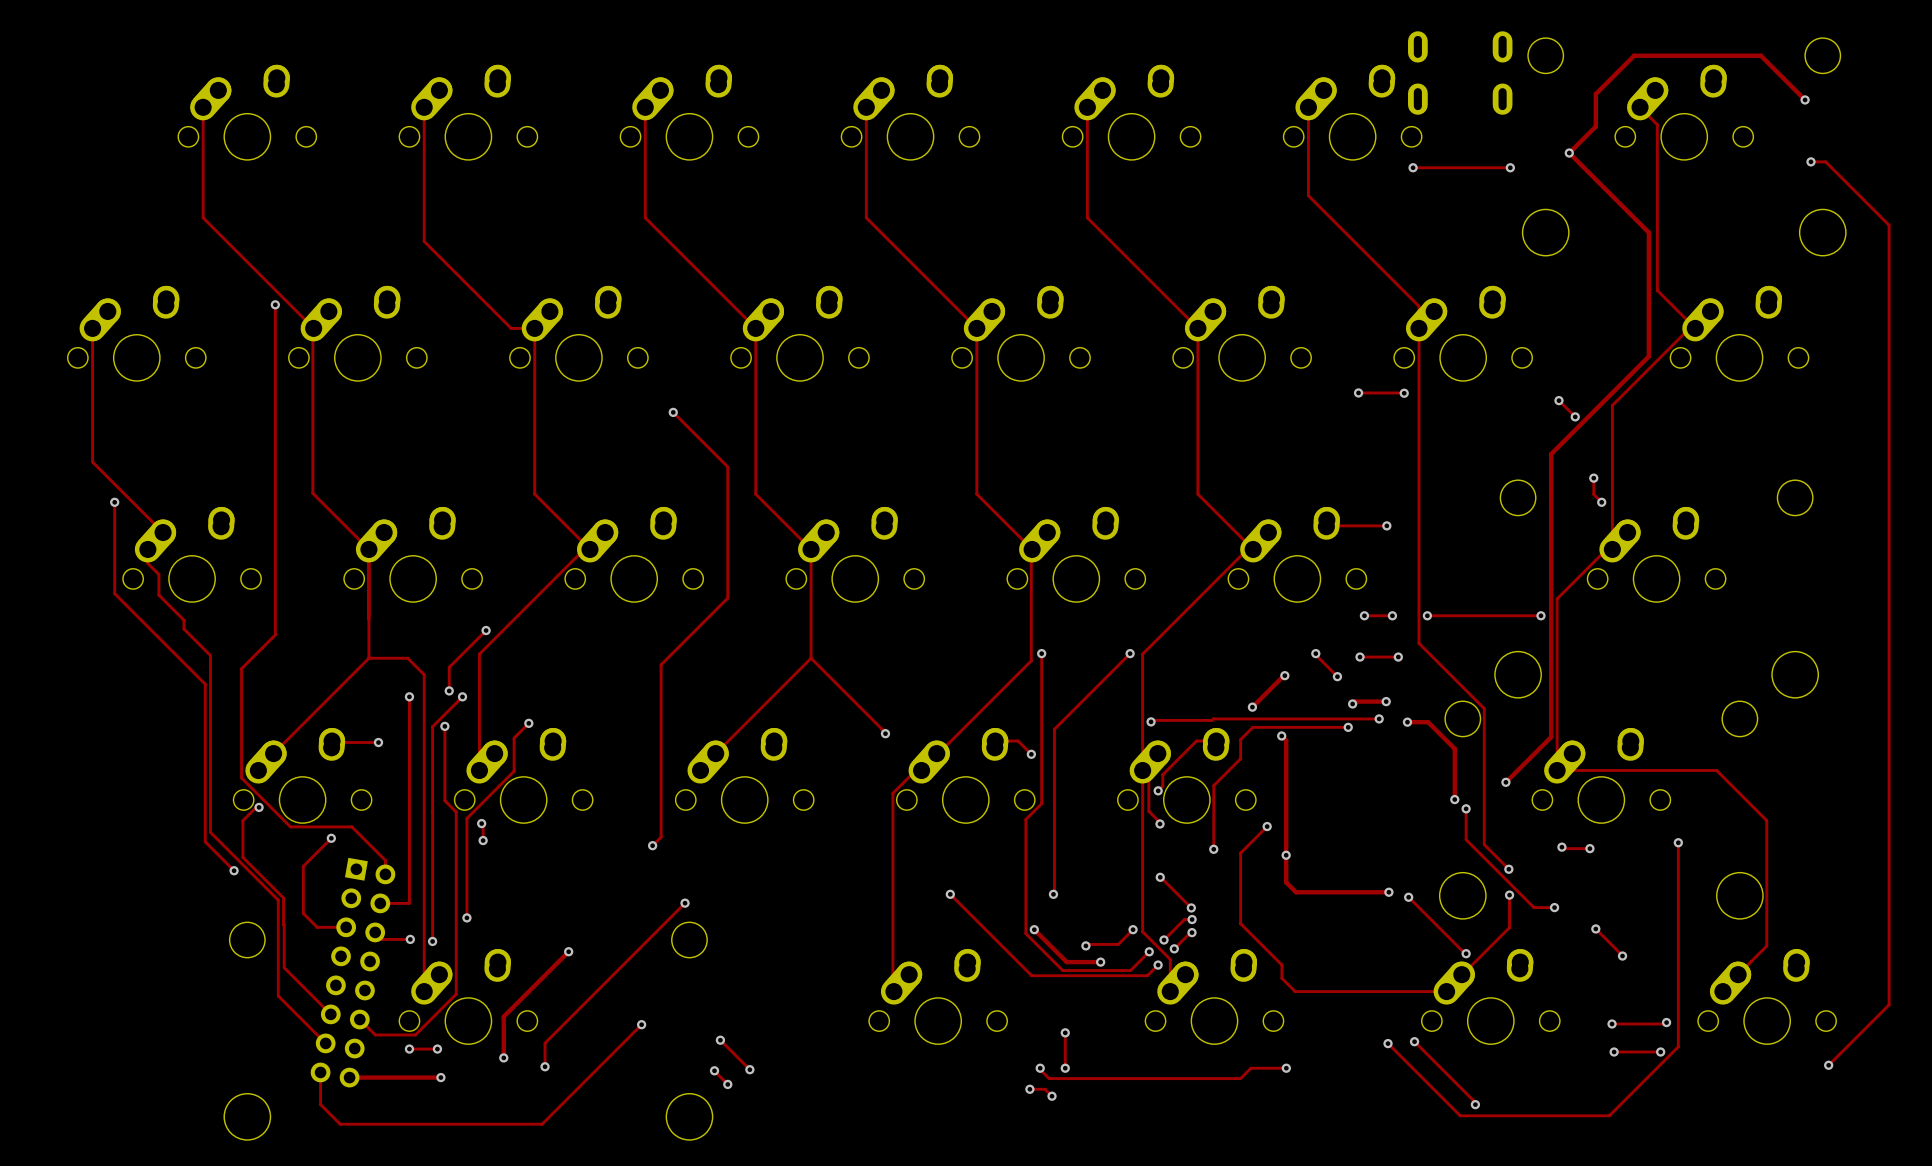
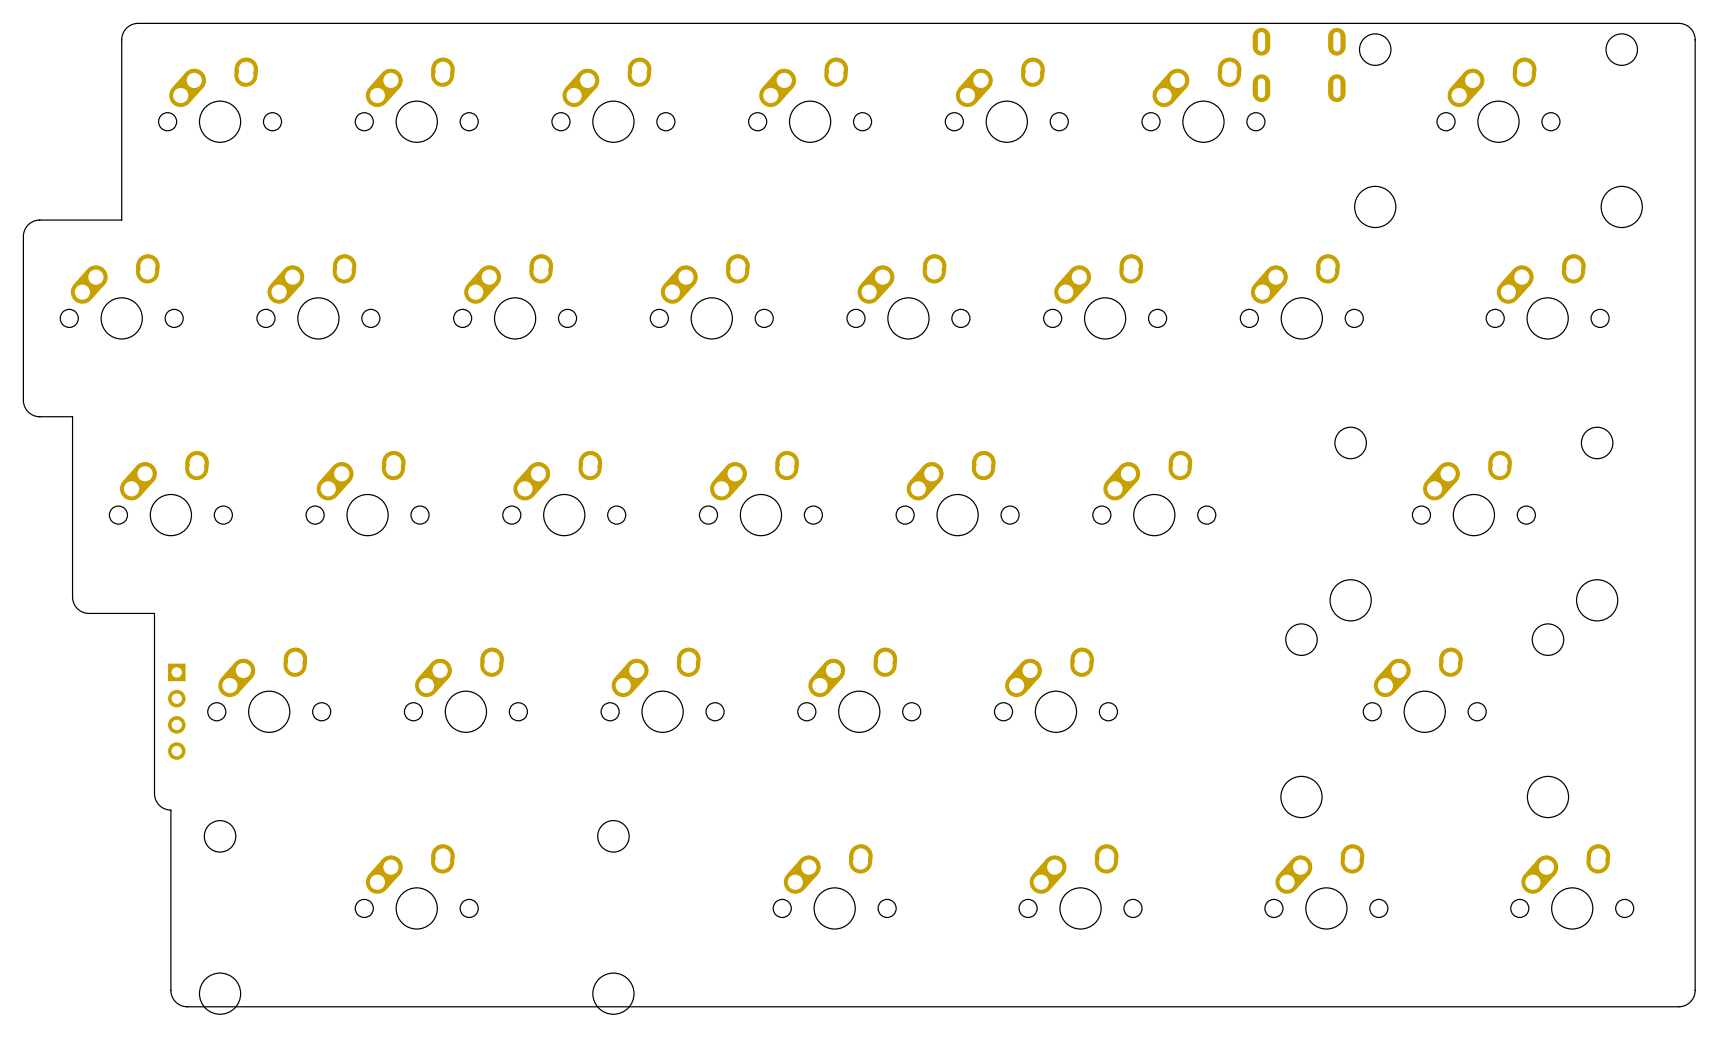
track: (1805, 99) (1760, 55) (1634, 55) (1595, 94) (1595, 126) (1569, 153) (1648, 232) (1648, 356) (1551, 454) (1551, 737) (1505, 782) -> none
via: (1805, 99) -> none
track: (203, 107) (203, 217) (313, 328) (312, 493) (368, 549) (368, 658) -> none
track: (424, 107) (424, 241) (511, 328) (534, 328) (534, 494) (589, 549) (584, 549) (479, 654) (479, 770) -> none
track: (645, 107) (645, 217) (755, 328) (755, 494) (811, 549) (811, 658) -> none
track: (866, 107) (866, 217) (976, 328) (976, 494) (1032, 549) (1031, 660) (921, 770) (915, 770) (892, 793) (893, 991) -> none
track: (1087, 107) (1087, 217) (1197, 328) (1197, 494) (1253, 549) (1247, 549) (1142, 654) (1142, 931) (1170, 959) (1170, 991) -> none
track: (1308, 107) (1308, 195) (1418, 306) (1418, 643) (1484, 708) (1484, 844) (1508, 869) -> none
track: (1640, 107) (1657, 124) (1657, 290) (1695, 328) (1689, 328) (1612, 405) (1612, 549) (1606, 549) (1557, 598) (1557, 770) (1716, 770) (1766, 820) (1766, 945) (1738, 974) -> none
via: (1569, 153) -> none
track: (1810, 161) (1825, 161) (1889, 225) (1889, 1004) (1828, 1065) -> none
via: (1810, 161) -> none
track: (1413, 167) (1510, 167) -> none
via: (1413, 167) -> none
via: (1510, 167) -> none
track: (275, 304) (275, 634) (241, 668) (241, 778) (290, 826) (351, 826) (385, 860) (385, 874) -> none
via: (275, 304) -> none
track: (92, 328) (92, 462) (163, 532) -> none
track: (1358, 392) (1404, 393) -> none
via: (1358, 392) -> none
via: (1404, 393) -> none
track: (1558, 400) (1575, 416) -> none
via: (1558, 400) -> none
track: (673, 412) (727, 466) (727, 598) (661, 664) (661, 837) (652, 845) -> none
via: (673, 412) -> none
via: (1575, 416) -> none
track: (1593, 478) (1593, 494) (1601, 502) -> none
via: (1593, 478) -> none
track: (114, 502) (114, 593) (205, 684) (205, 841) (234, 870) -> none
via: (114, 502) -> none
via: (1601, 502) -> none
track: (1386, 525) (1326, 526) -> none
via: (1386, 525) -> none
track: (147, 549) (147, 563) (158, 574) (158, 595) (183, 620) (183, 629) (210, 655) (210, 832) (278, 900) (278, 996) (325, 1043) -> none
track: (1364, 615) (1392, 615) -> none
via: (1364, 615) -> none
via: (1392, 615) -> none
track: (1427, 615) (1540, 615) -> none
via: (1427, 615) -> none
via: (1540, 615) -> none
track: (486, 630) (449, 667) (449, 690) -> none
via: (486, 630) -> none
track: (1041, 653) (1041, 803) (1025, 819) (1025, 933) (1062, 970) (1130, 970) (1149, 951) -> none
via: (1041, 653) -> none
track: (1130, 653) (1054, 729) (1053, 894) -> none
via: (1130, 653) -> none
track: (1315, 653) (1337, 676) -> none
via: (1315, 653) -> none
track: (1360, 657) (1398, 657) -> none
via: (1360, 657) -> none
via: (1398, 657) -> none
track: (368, 658) (258, 770) -> none
track: (368, 658) (407, 658) (424, 674) (424, 991) -> none
track: (811, 658) (715, 753) -> none
track: (811, 658) (885, 733) -> none
track: (1284, 675) (1252, 707) -> none
via: (1284, 675) -> none
via: (1337, 676) -> none
via: (449, 690) -> none
track: (409, 696) (409, 903) (380, 903) -> none
via: (409, 696) -> none
track: (462, 696) (432, 726) (432, 941) -> none
via: (462, 696) -> none
track: (1386, 701) (1355, 701) (1352, 703) -> none
via: (1386, 701) -> none
via: (1352, 703) -> none
via: (1252, 707) -> none
track: (1379, 718) (1213, 718) (1150, 720) (1151, 721) -> none
via: (1379, 718) -> none
via: (1151, 721) -> none
track: (1407, 722) (1428, 722) (1454, 748) (1454, 799) -> none
via: (1407, 722) -> none
track: (528, 723) (514, 738) (514, 771) (466, 818) (466, 917) -> none
via: (528, 723) -> none
track: (444, 726) (444, 800) (456, 812) (456, 994) (415, 1034) (375, 1034) (359, 1019) -> none
via: (444, 726) -> none
track: (1348, 727) (1252, 727) (1240, 739) (1240, 758) (1213, 785) (1213, 849) -> none
via: (1348, 727) -> none
via: (885, 733) -> none
track: (1281, 735) (1286, 740) (1286, 882) (1296, 892) (1388, 892) -> none
via: (1281, 735) -> none
track: (1216, 741) (1196, 741) (1162, 774) (1162, 786) (1158, 790) -> none
track: (378, 742) (336, 742) (331, 747) -> none
via: (378, 742) -> none
track: (994, 747) (1001, 741) (1018, 741) (1031, 754) -> none
via: (1031, 754) -> none
track: (1142, 770) (1148, 776) (1148, 811) (1160, 823) -> none
via: (1505, 782) -> none
via: (1158, 790) -> none
part: none -> (176, 711)
via: (1454, 799) -> none
track: (259, 807) (256, 807) (242, 820) (242, 857) (283, 898) (284, 967) (330, 1014) -> none
via: (259, 807) -> none
track: (1466, 808) (1466, 839) (1533, 907) (1554, 907) -> none
via: (1466, 808) -> none
track: (481, 823) (483, 840) -> none
via: (481, 823) -> none
via: (1160, 823) -> none
track: (1267, 826) (1240, 853) (1240, 923) (1281, 965) (1281, 978) (1295, 991) (1446, 991) (1509, 927) (1509, 895) -> none
via: (1267, 826) -> none
track: (331, 838) (303, 866) (303, 913) (317, 927) (346, 927) -> none
via: (331, 838) -> none
via: (483, 840) -> none
track: (1678, 842) (1678, 1046) (1609, 1115) (1460, 1115) (1388, 1043) -> none
via: (1678, 842) -> none
via: (652, 845) -> none
track: (1561, 847) (1589, 848) -> none
via: (1561, 847) -> none
via: (1589, 848) -> none
via: (1213, 849) -> none
via: (1286, 855) -> none
via: (1508, 869) -> none
via: (234, 870) -> none
track: (1160, 877) (1191, 907) -> none
via: (1160, 877) -> none
via: (1388, 892) -> none
track: (950, 894) (1031, 975) (1147, 975) (1158, 965) -> none
via: (950, 894) -> none
via: (1053, 894) -> none
via: (1509, 895) -> none
track: (1408, 897) (1466, 953) -> none
via: (1408, 897) -> none
track: (685, 903) (545, 1043) (545, 1066) -> none
via: (685, 903) -> none
via: (1191, 907) -> none
via: (1554, 907) -> none
board edge: none -> (170, 810) (159, 805) (154, 795) (154, 613) (86, 613) (80, 611) (74, 605) (72, 597) (72, 416) (35, 416) (26, 410) (23, 400) (23, 232) (29, 223) (37, 220) (121, 220) (121, 39) (123, 31) (129, 25) (138, 23) (1678, 23) (1686, 25) (1692, 31) (1695, 39) (1695, 990) (1692, 998) (1686, 1004) (1678, 1006) (185, 1006) (175, 1001) (171, 992) (170, 810)
via: (466, 917) -> none
track: (1192, 919) (1184, 919) (1164, 940) -> none
via: (1192, 919) -> none
track: (1595, 928) (1622, 956) -> none
via: (1595, 928) -> none
track: (1034, 929) (1066, 962) (1100, 962) -> none
via: (1034, 929) -> none
track: (1133, 929) (1118, 944) (1085, 945) -> none
via: (1133, 929) -> none
track: (375, 932) (382, 939) (410, 939) -> none
track: (1192, 932) (1174, 948) -> none
via: (1192, 932) -> none
via: (410, 939) -> none
via: (1164, 940) -> none
via: (432, 941) -> none
via: (1085, 945) -> none
via: (1174, 948) -> none
track: (568, 951) (503, 1016) (503, 1057) -> none
via: (568, 951) -> none
via: (1149, 951) -> none
via: (1466, 953) -> none
via: (1622, 956) -> none
via: (1100, 962) -> none
via: (1158, 965) -> none
part: (352, 972) -> none
track: (1666, 1022) (1612, 1024) -> none
via: (1666, 1022) -> none
track: (641, 1024) (542, 1124) (340, 1124) (320, 1104) (321, 1072) -> none
via: (641, 1024) -> none
via: (1612, 1024) -> none
track: (1065, 1032) (1065, 1068) -> none
via: (1065, 1032) -> none
track: (720, 1040) (749, 1069) -> none
via: (720, 1040) -> none
track: (1414, 1041) (1475, 1104) -> none
via: (1414, 1041) -> none
via: (1388, 1043) -> none
track: (409, 1049) (437, 1049) -> none
via: (409, 1049) -> none
via: (437, 1049) -> none
track: (1614, 1052) (1660, 1052) -> none
via: (1614, 1052) -> none
via: (1660, 1052) -> none
via: (503, 1057) -> none
via: (1828, 1065) -> none
via: (545, 1066) -> none
track: (1040, 1068) (1049, 1078) (1240, 1078) (1250, 1068) (1286, 1068) -> none
via: (1040, 1068) -> none
via: (1065, 1068) -> none
via: (1286, 1068) -> none
via: (749, 1069) -> none
track: (714, 1070) (727, 1084) -> none
via: (714, 1070) -> none
track: (349, 1077) (440, 1077) -> none
via: (440, 1077) -> none
via: (727, 1084) -> none
track: (1029, 1089) (1045, 1089) (1052, 1096) -> none
via: (1029, 1089) -> none
via: (1052, 1096) -> none
via: (1475, 1104) -> none

